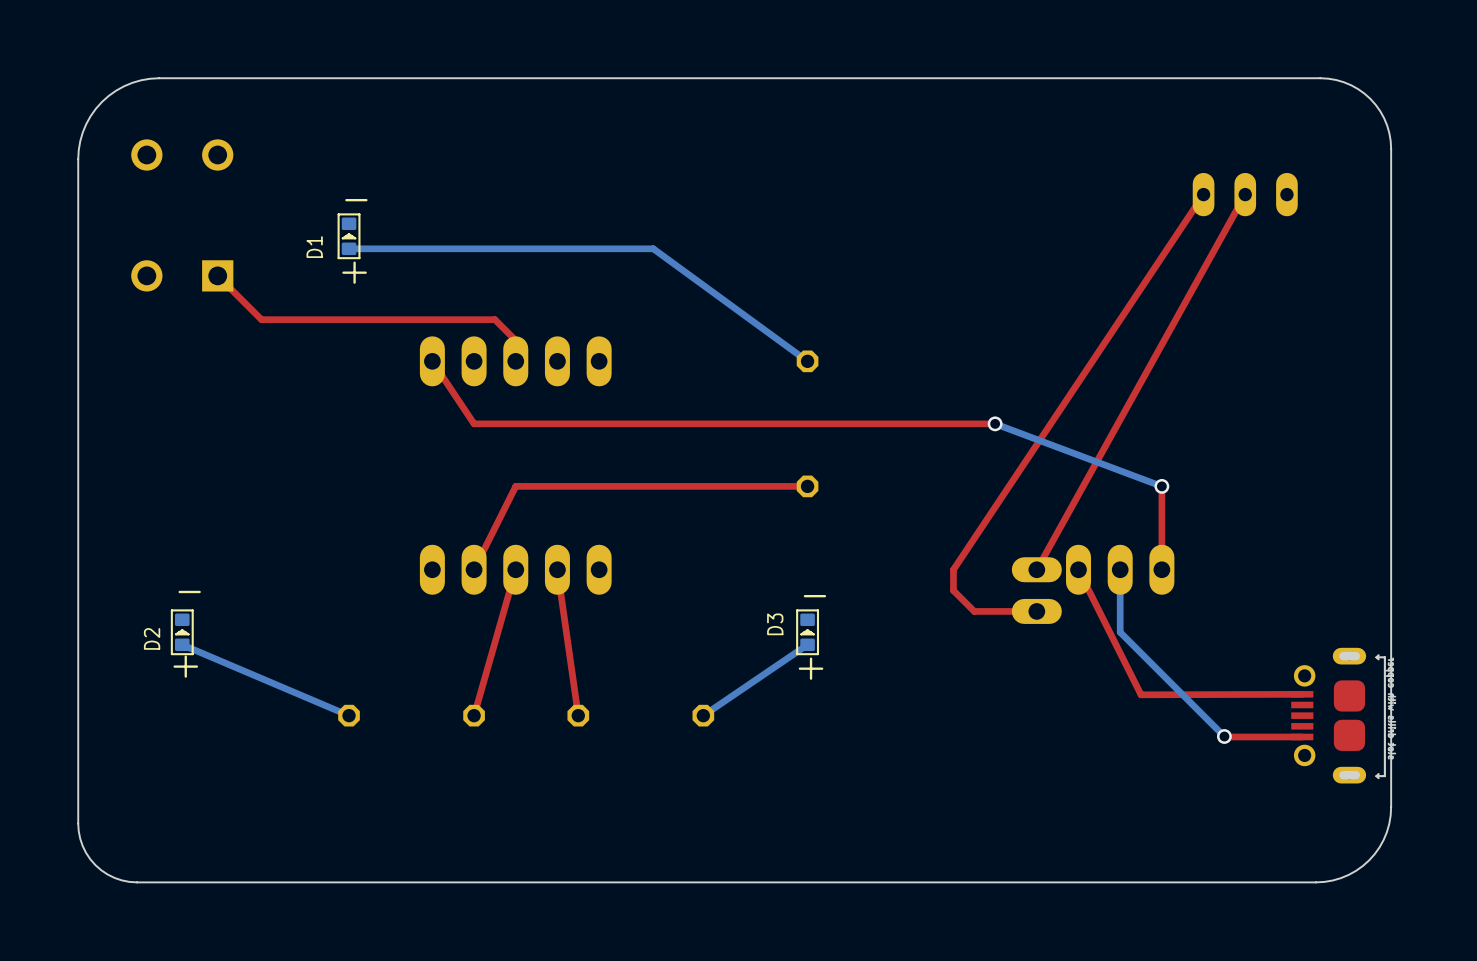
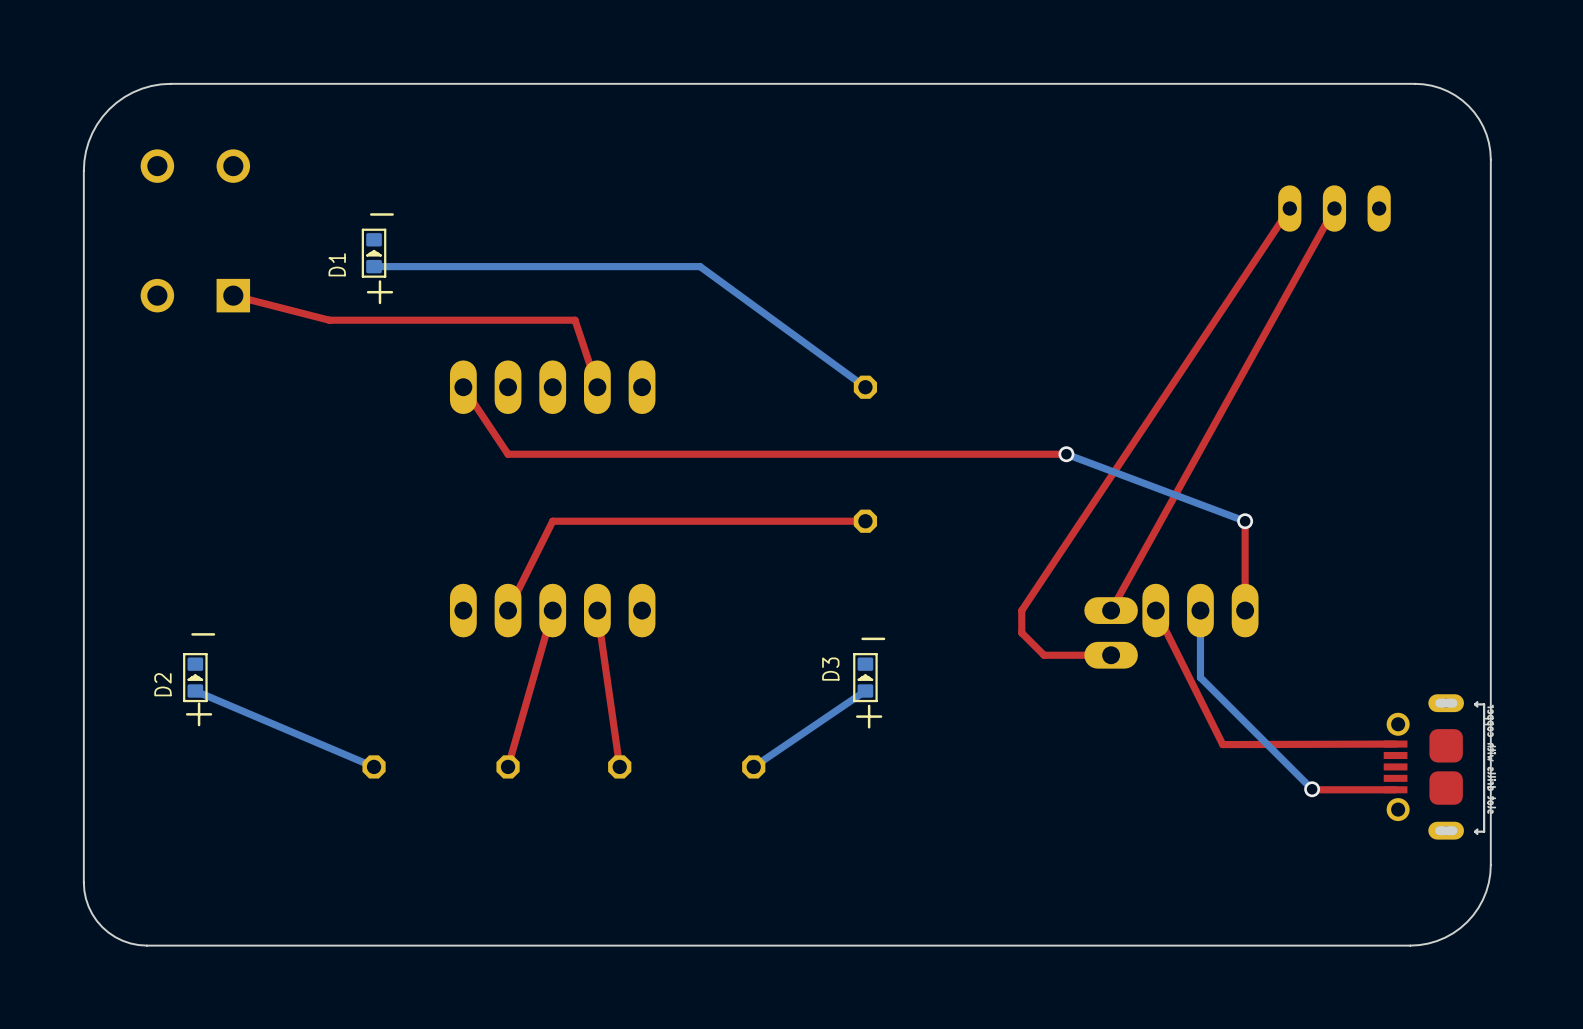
top track: (217, 275) (261, 319) (494, 319) (515, 340) (515, 361) -> (233, 295) (329, 320) (575, 320) (597, 387)

